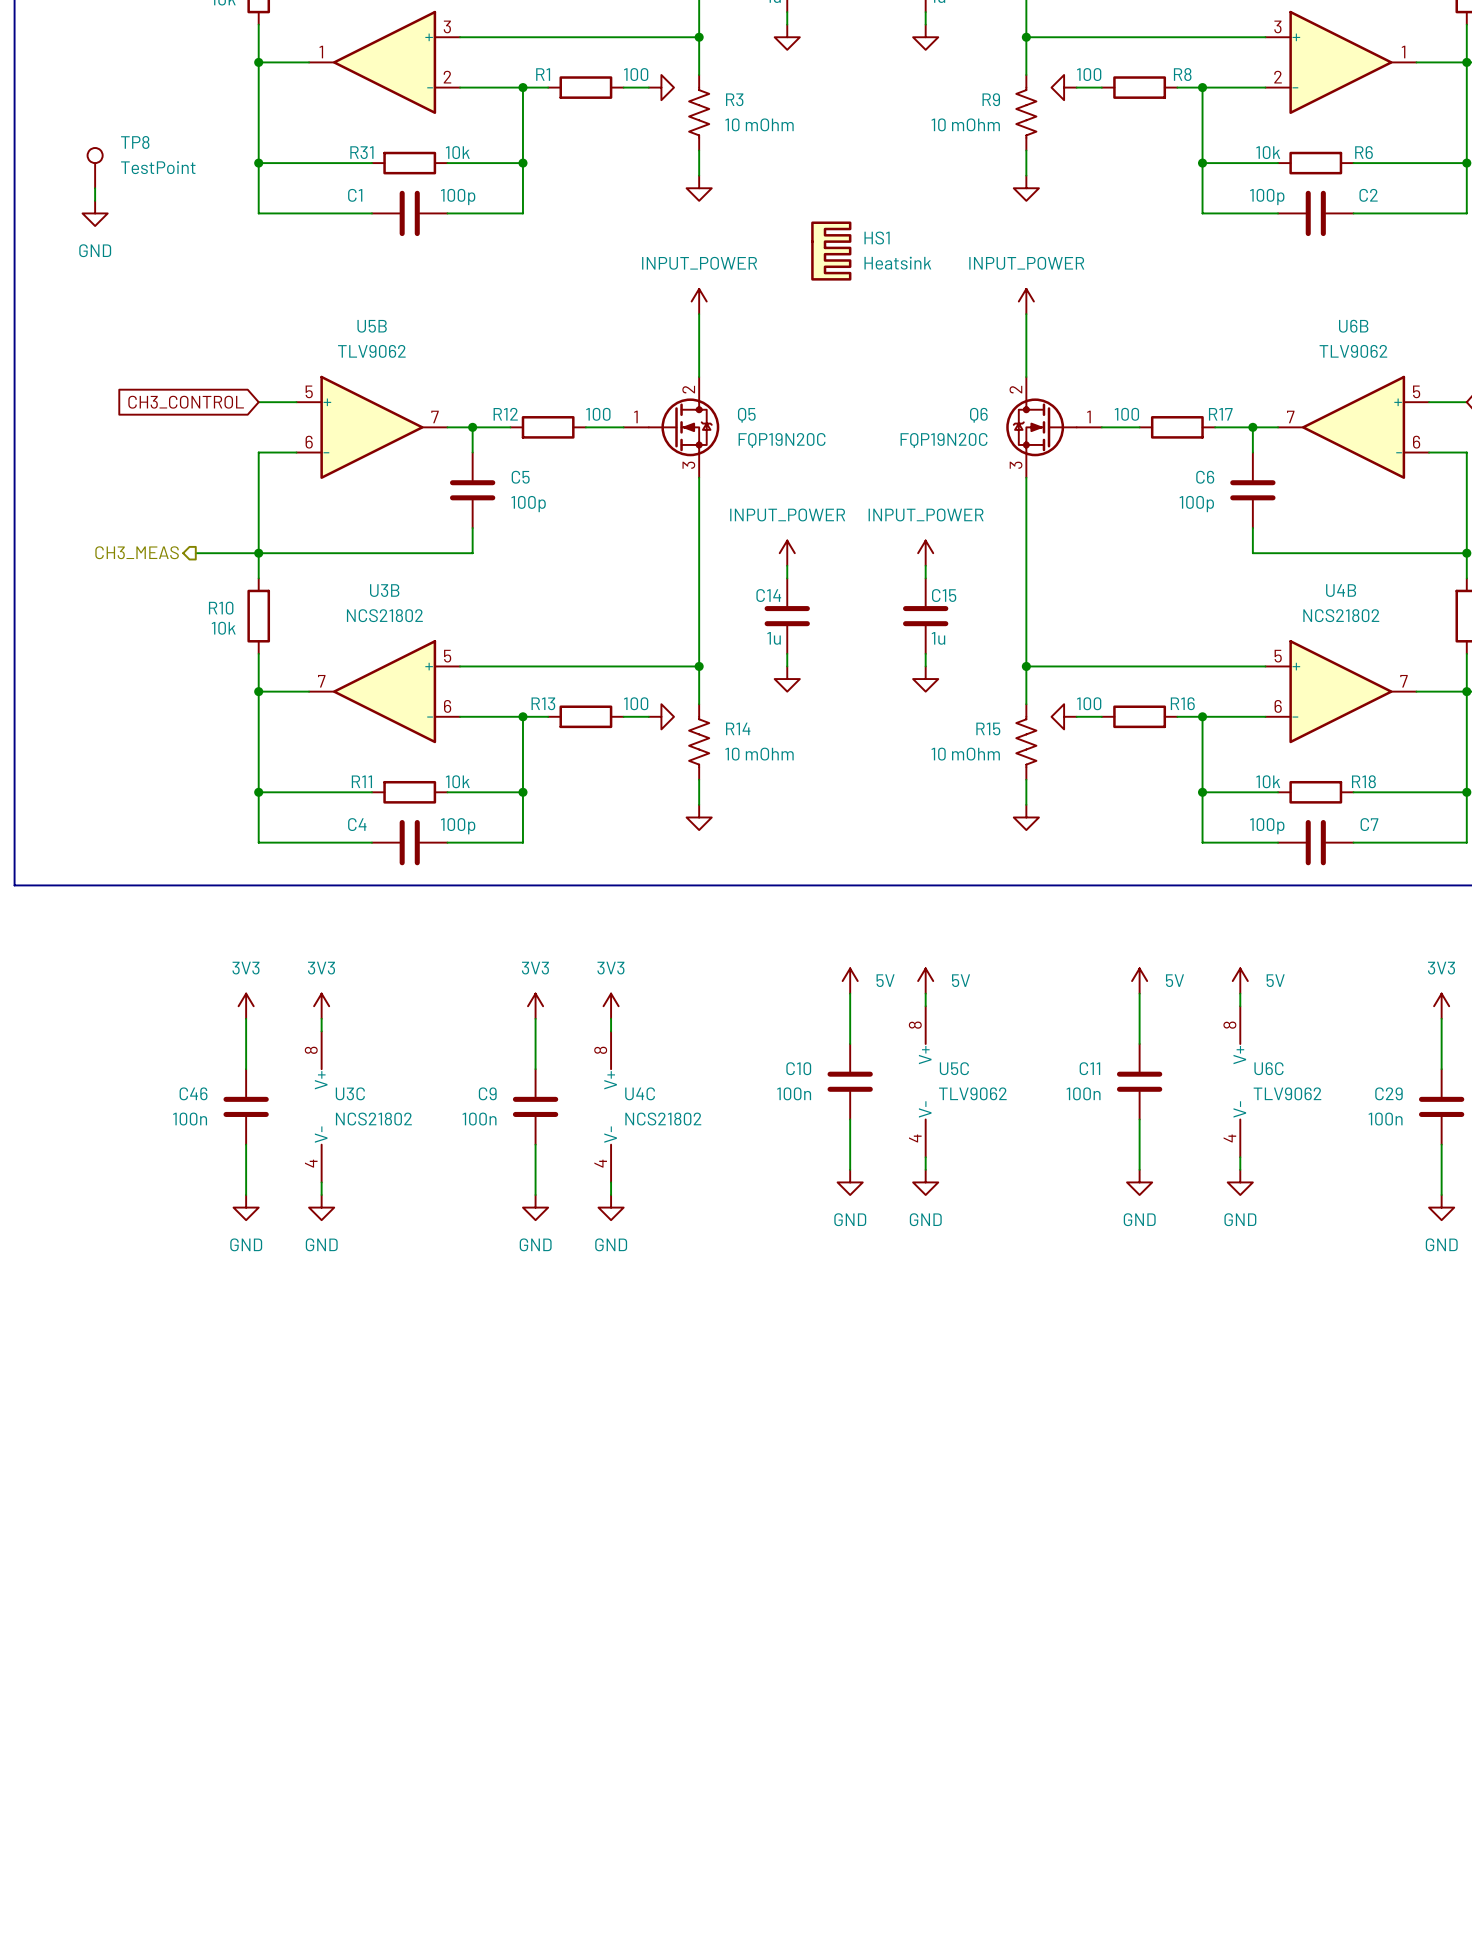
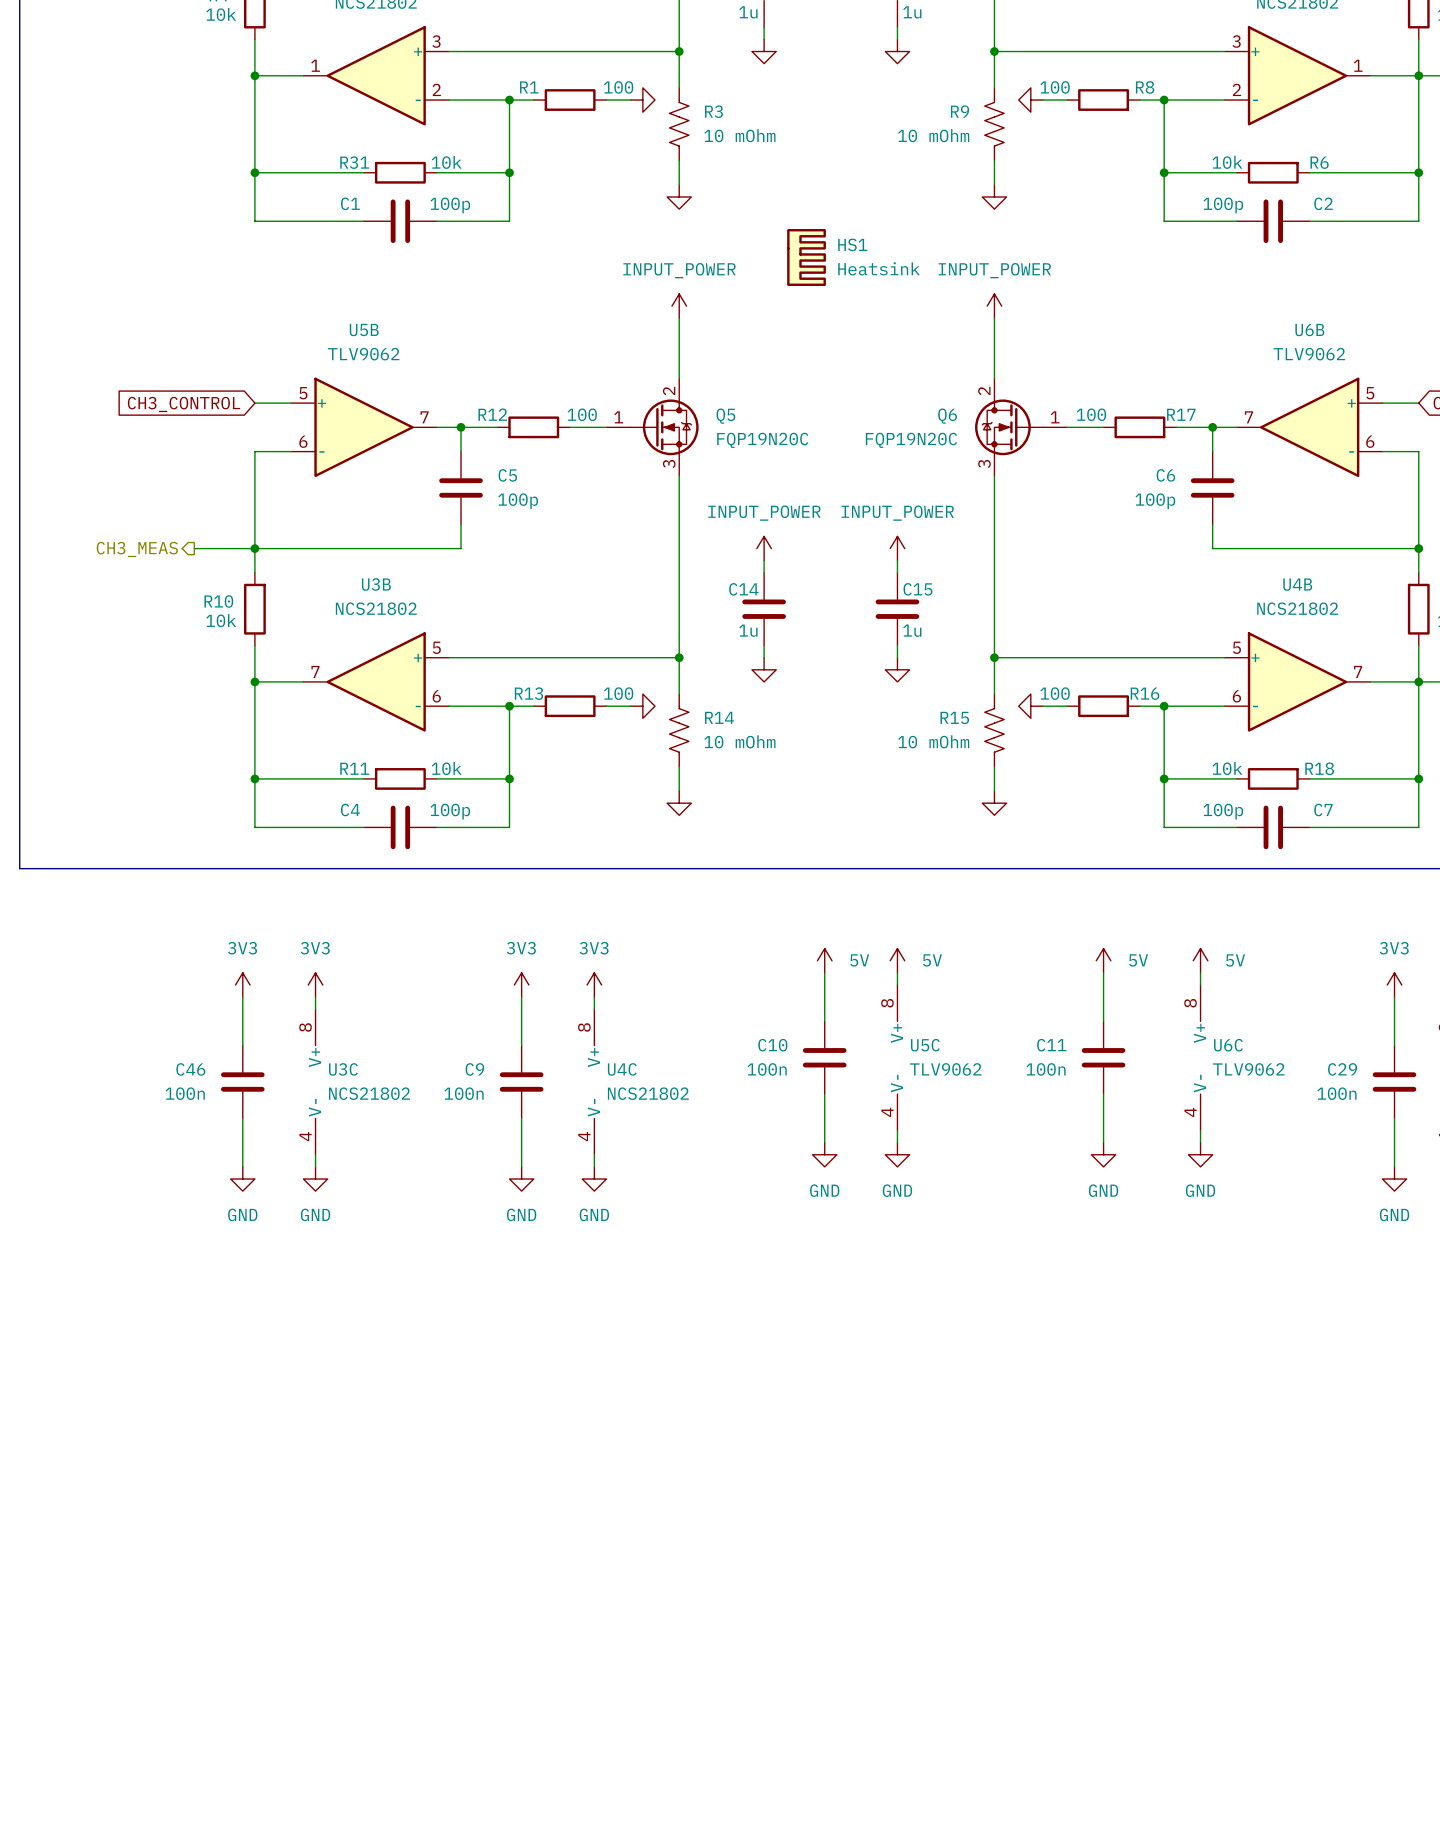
TP8: TestPoint (95, 168) -> none
wire: (95, 188) (95, 200) -> none
power symbol: GND (95, 213) -> none

